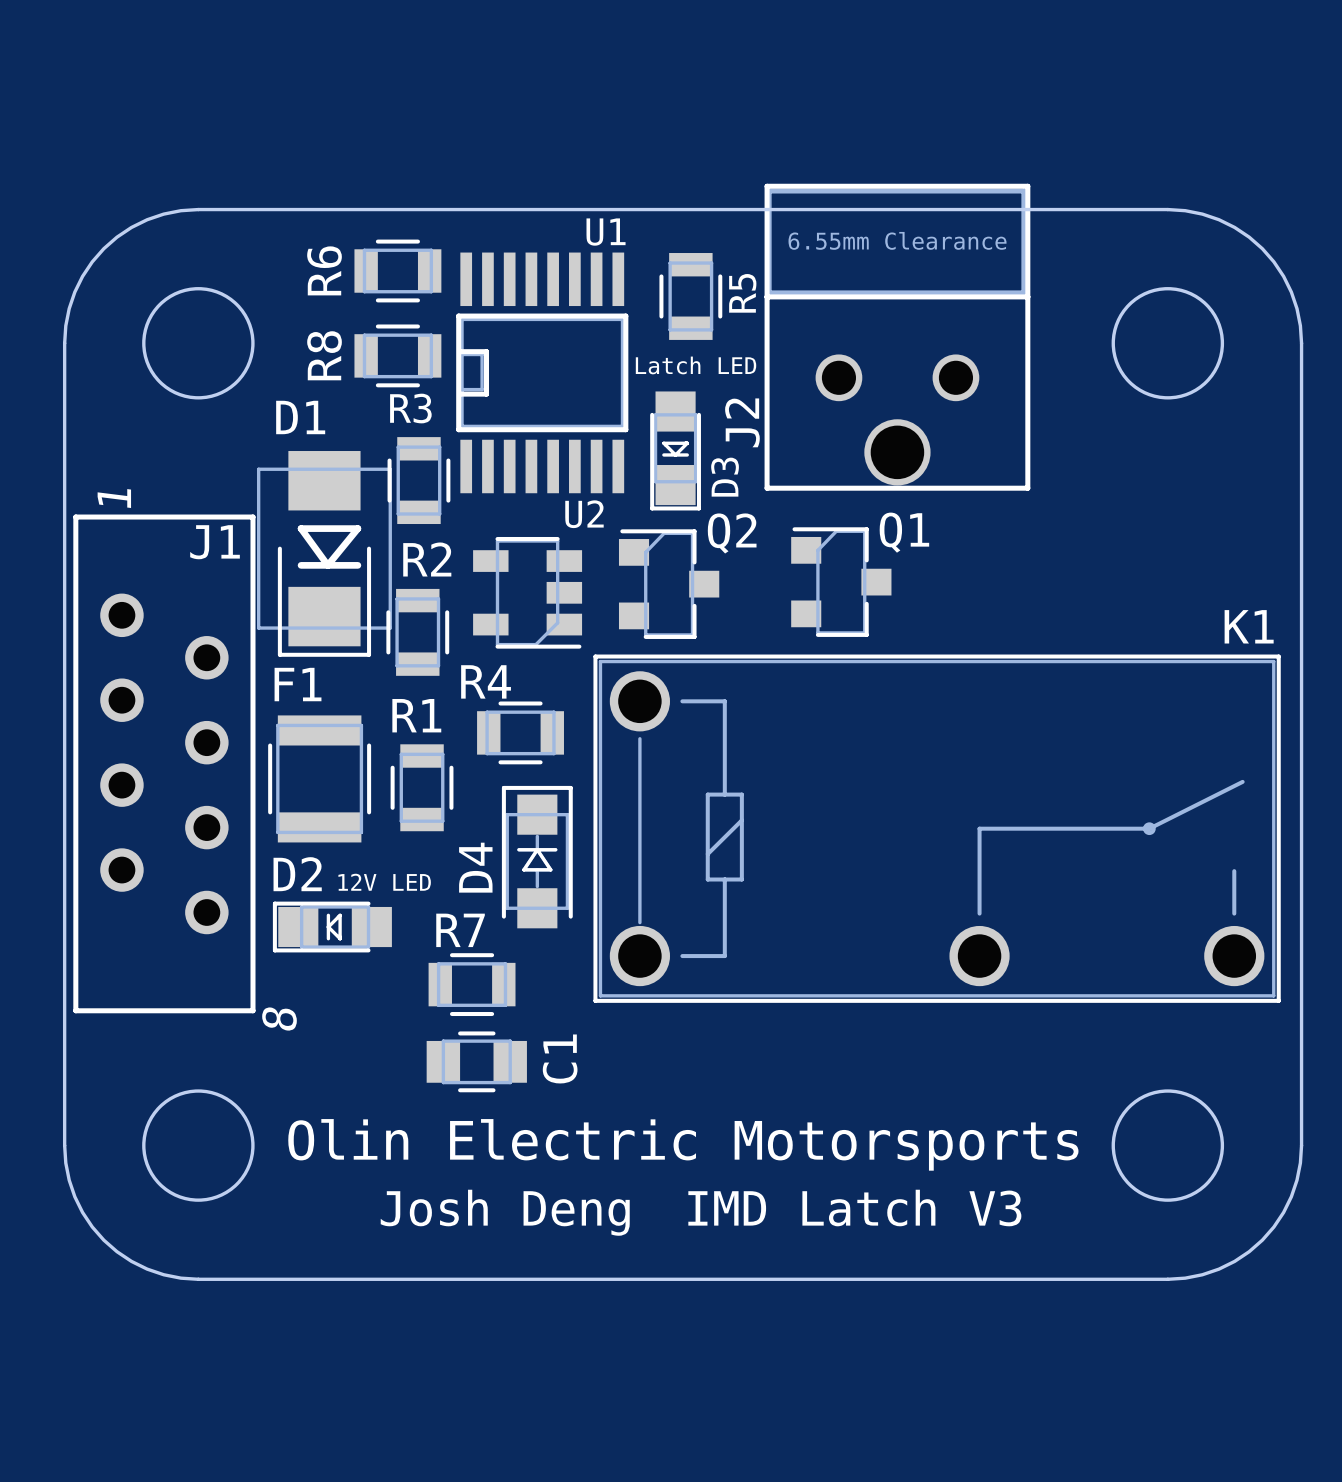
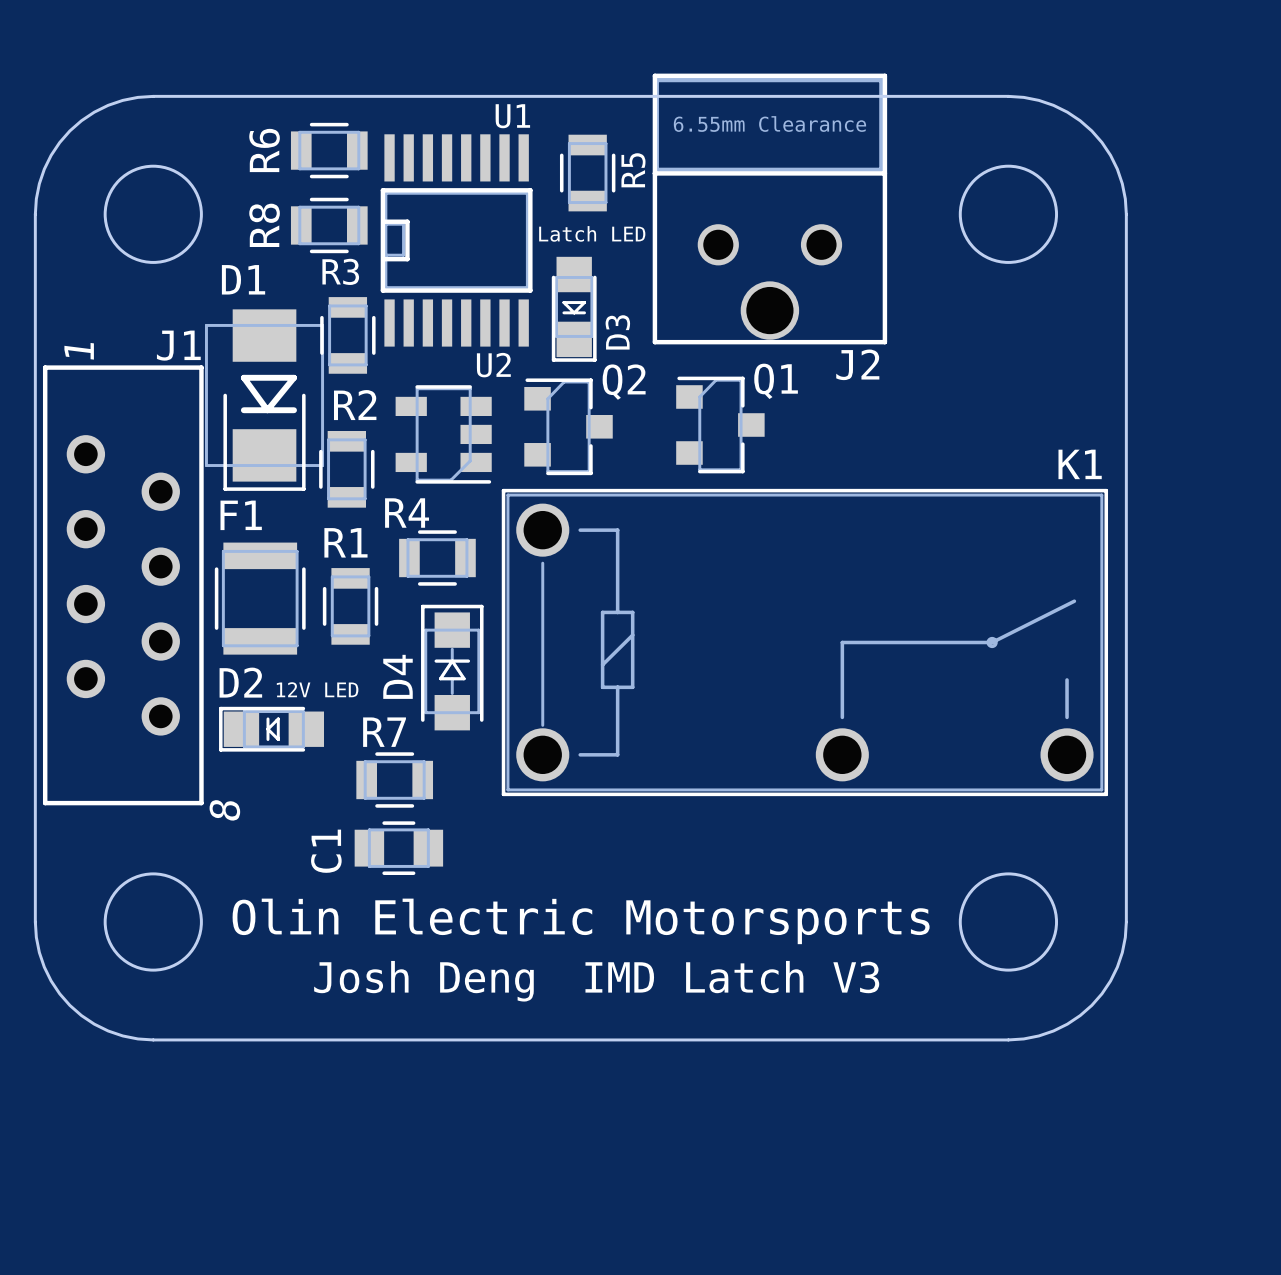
J2 name rotation: 0° (742, 422) -> 90° clockwise (857, 364)
J2 name position: J2 (742, 422) -> J2 (857, 364)
J1 name position: J1 (215, 542) -> J1 (178, 345)
C1 name position: C1 (560, 1058) -> C1 (326, 851)

